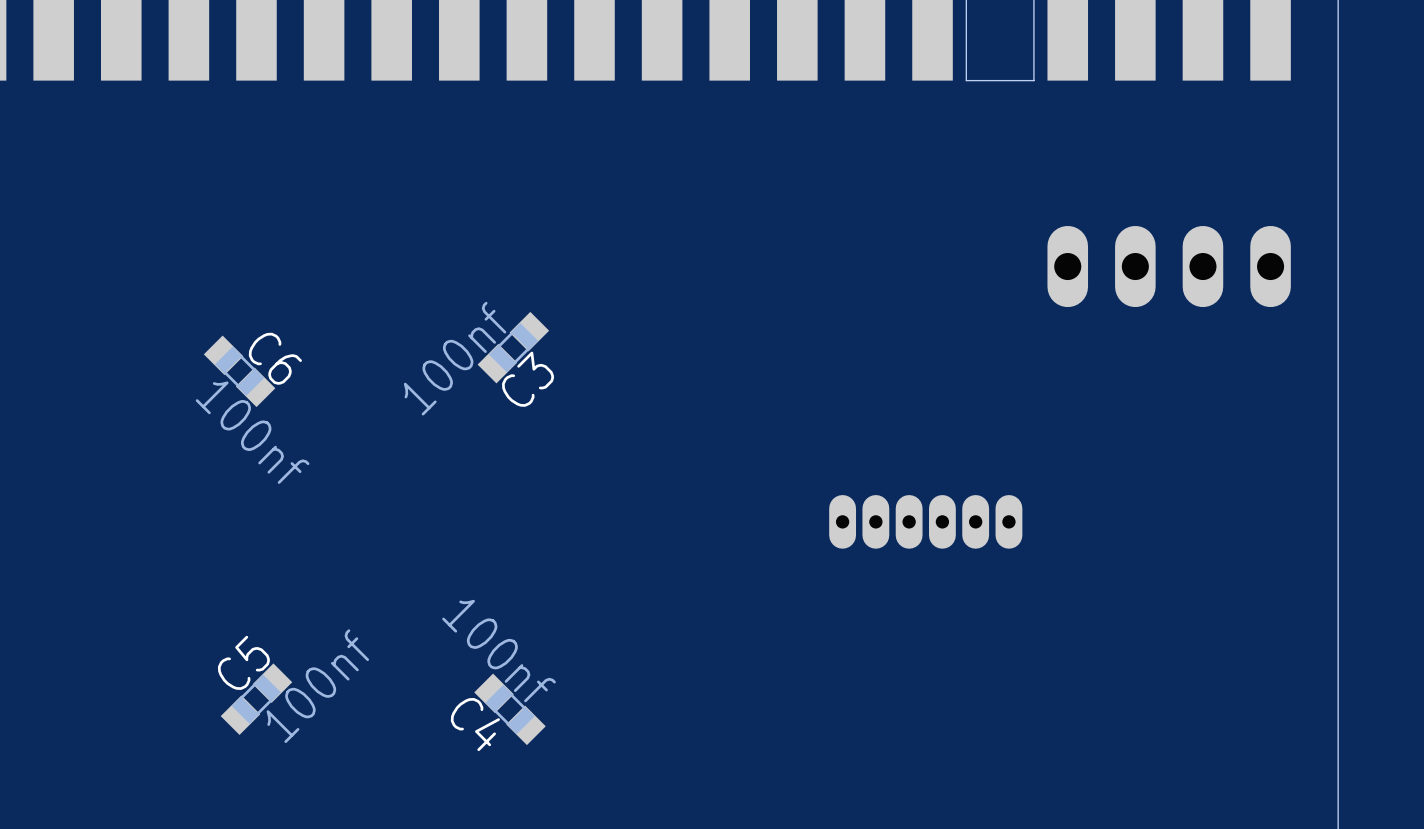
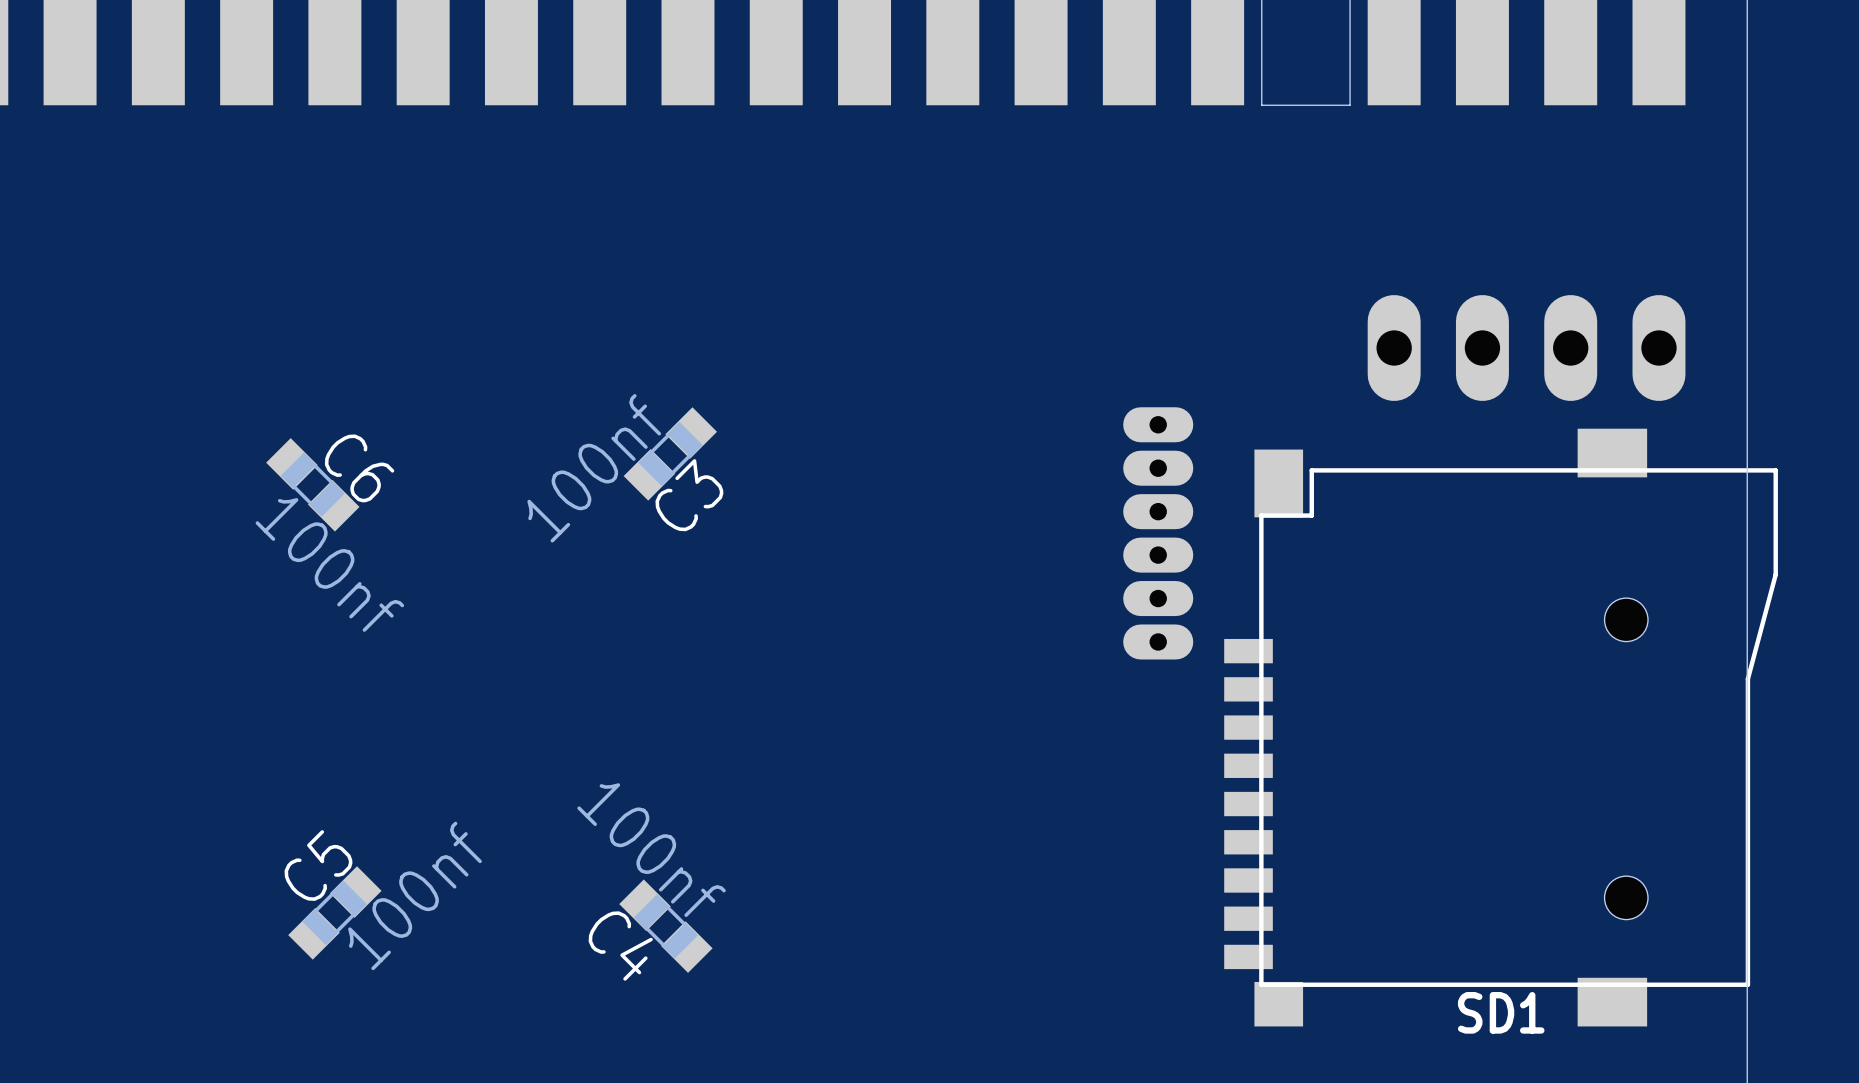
part rotation: 0° (925, 521) -> 90° clockwise (1158, 533)
part position: (925, 521) -> (1158, 533)
SD1: none -> (1501, 727)

